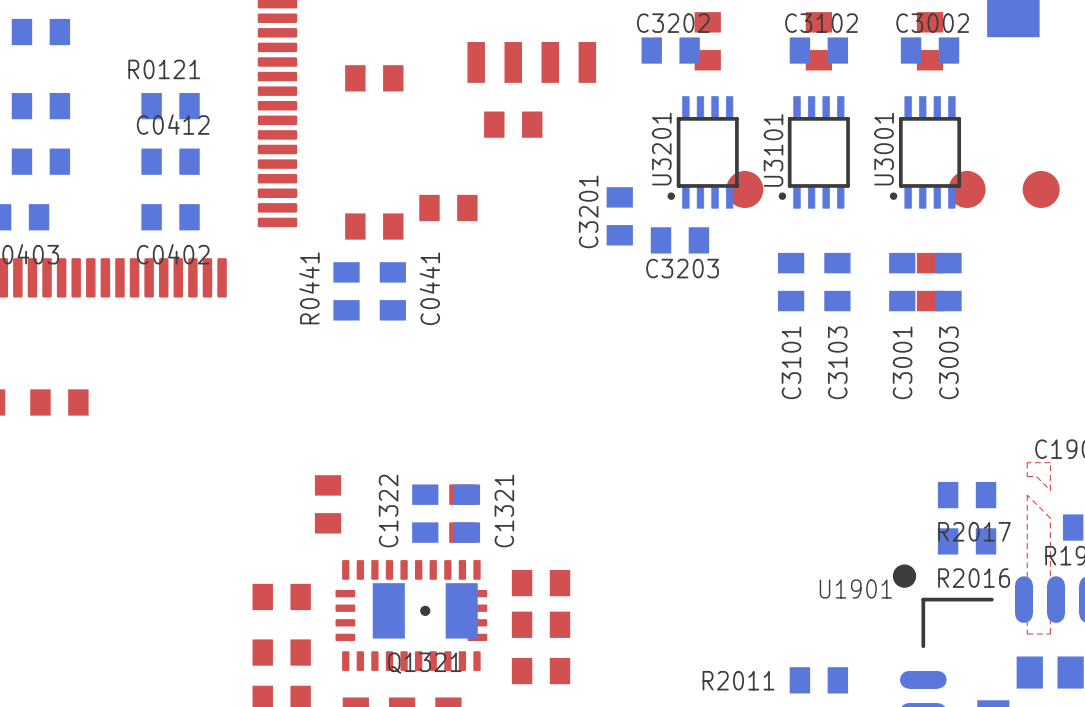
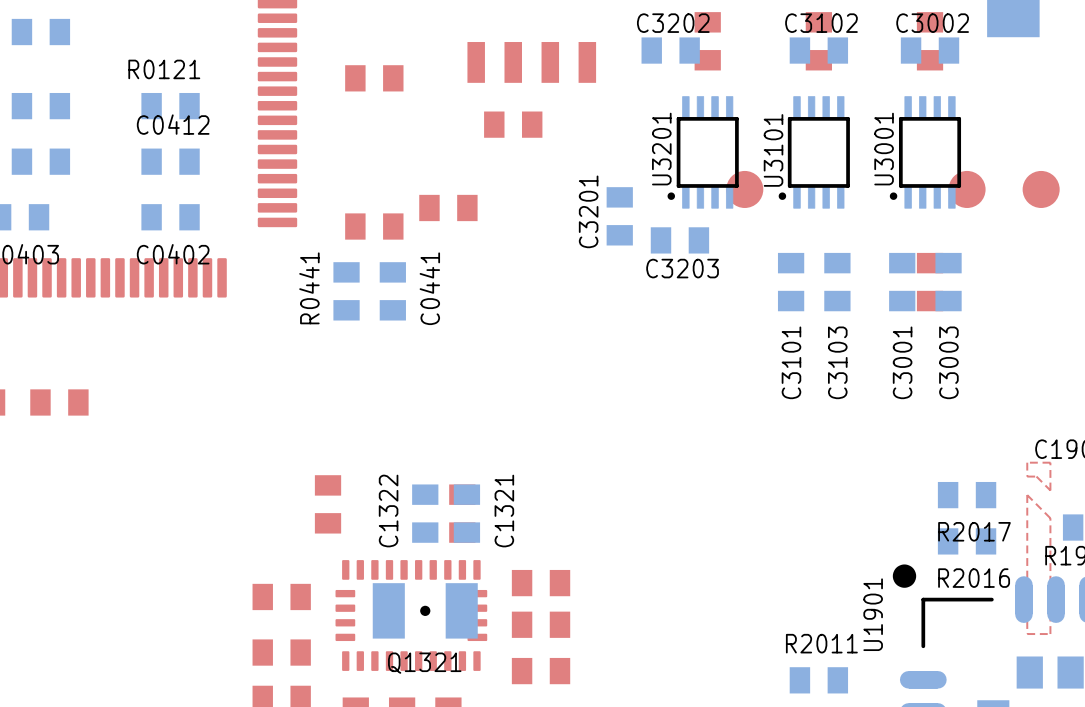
U1901 name rotation: 0° (855, 589) -> 90° counterclockwise (873, 614)
R2011 name position: R2011 (738, 680) -> R2011 (821, 643)

